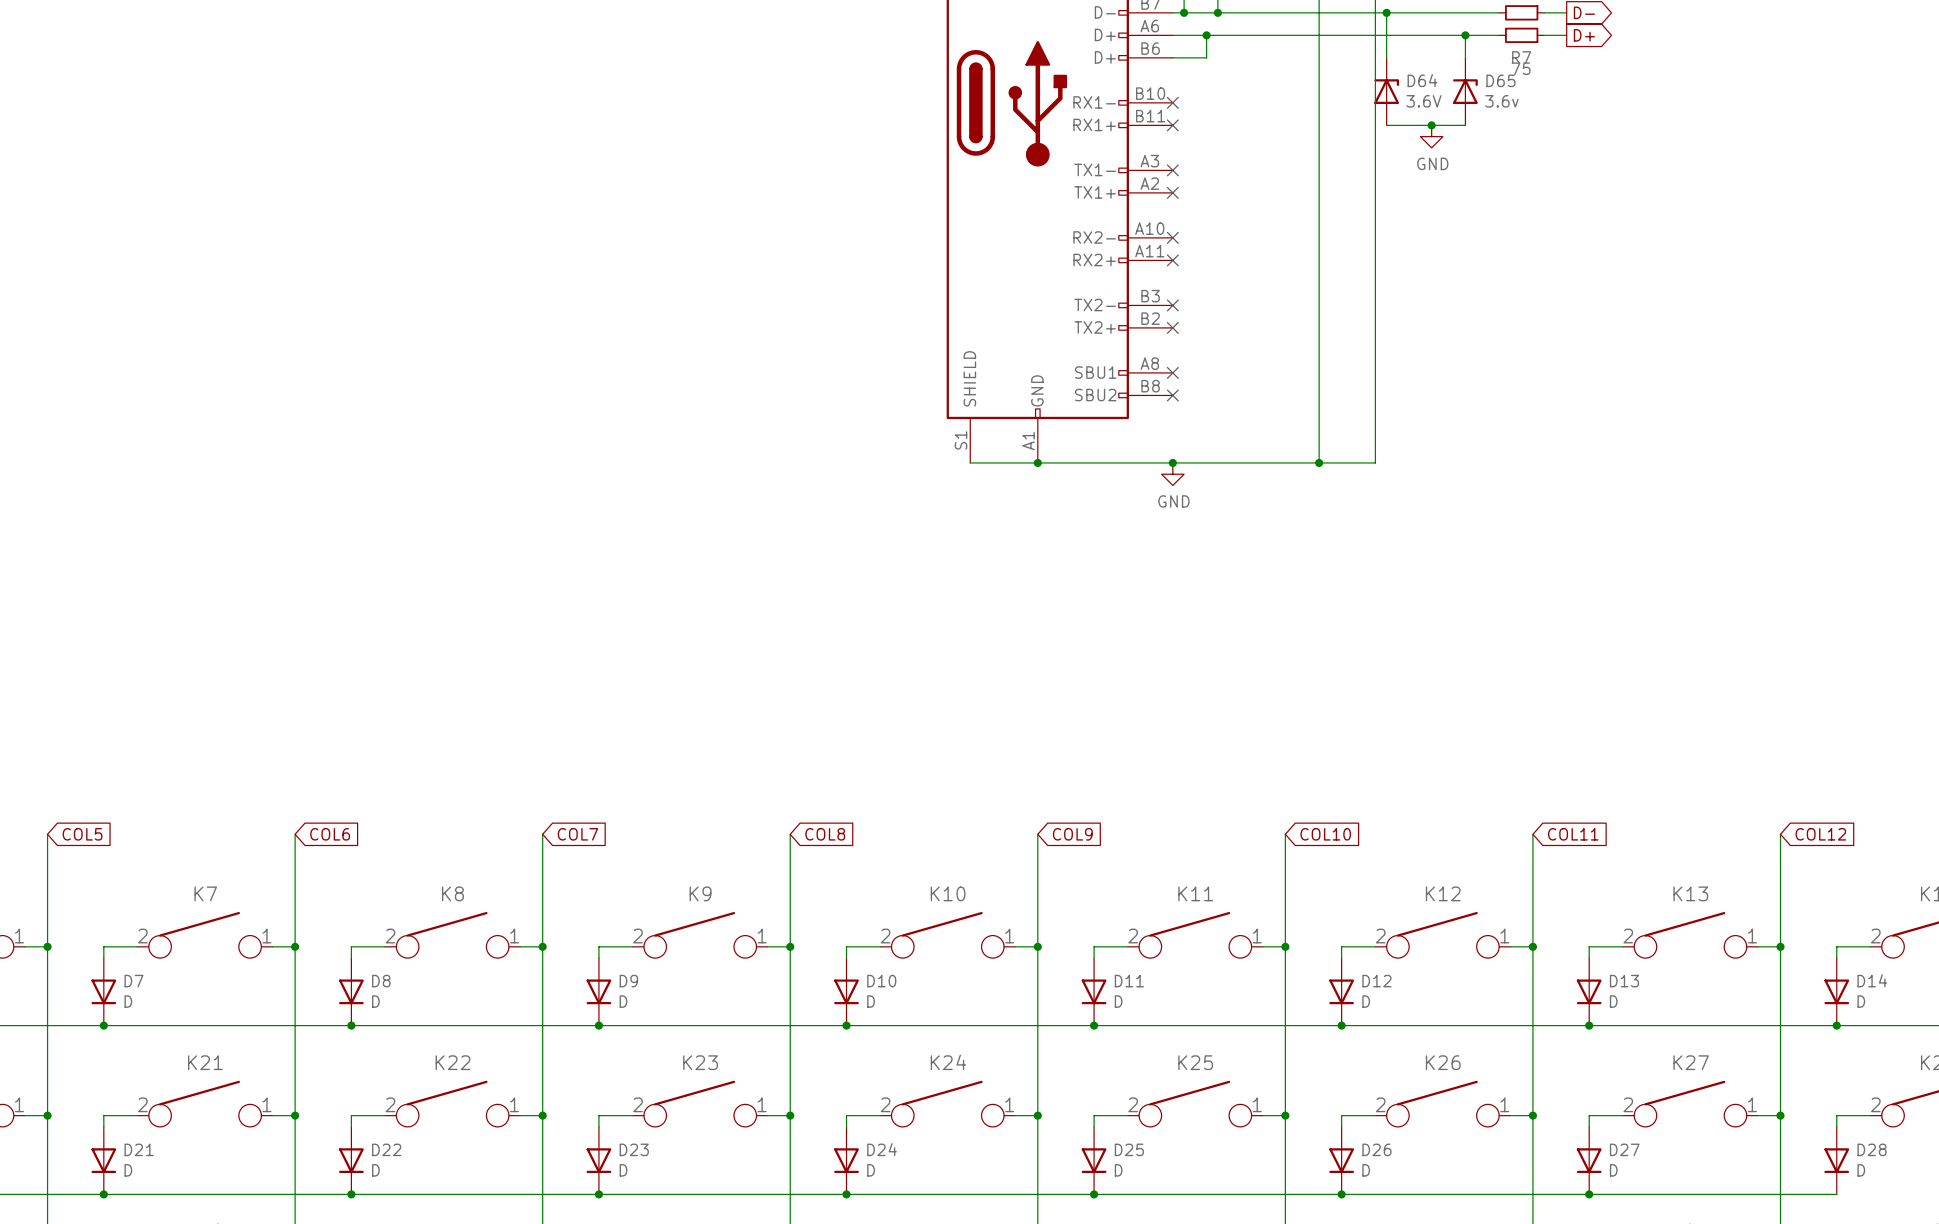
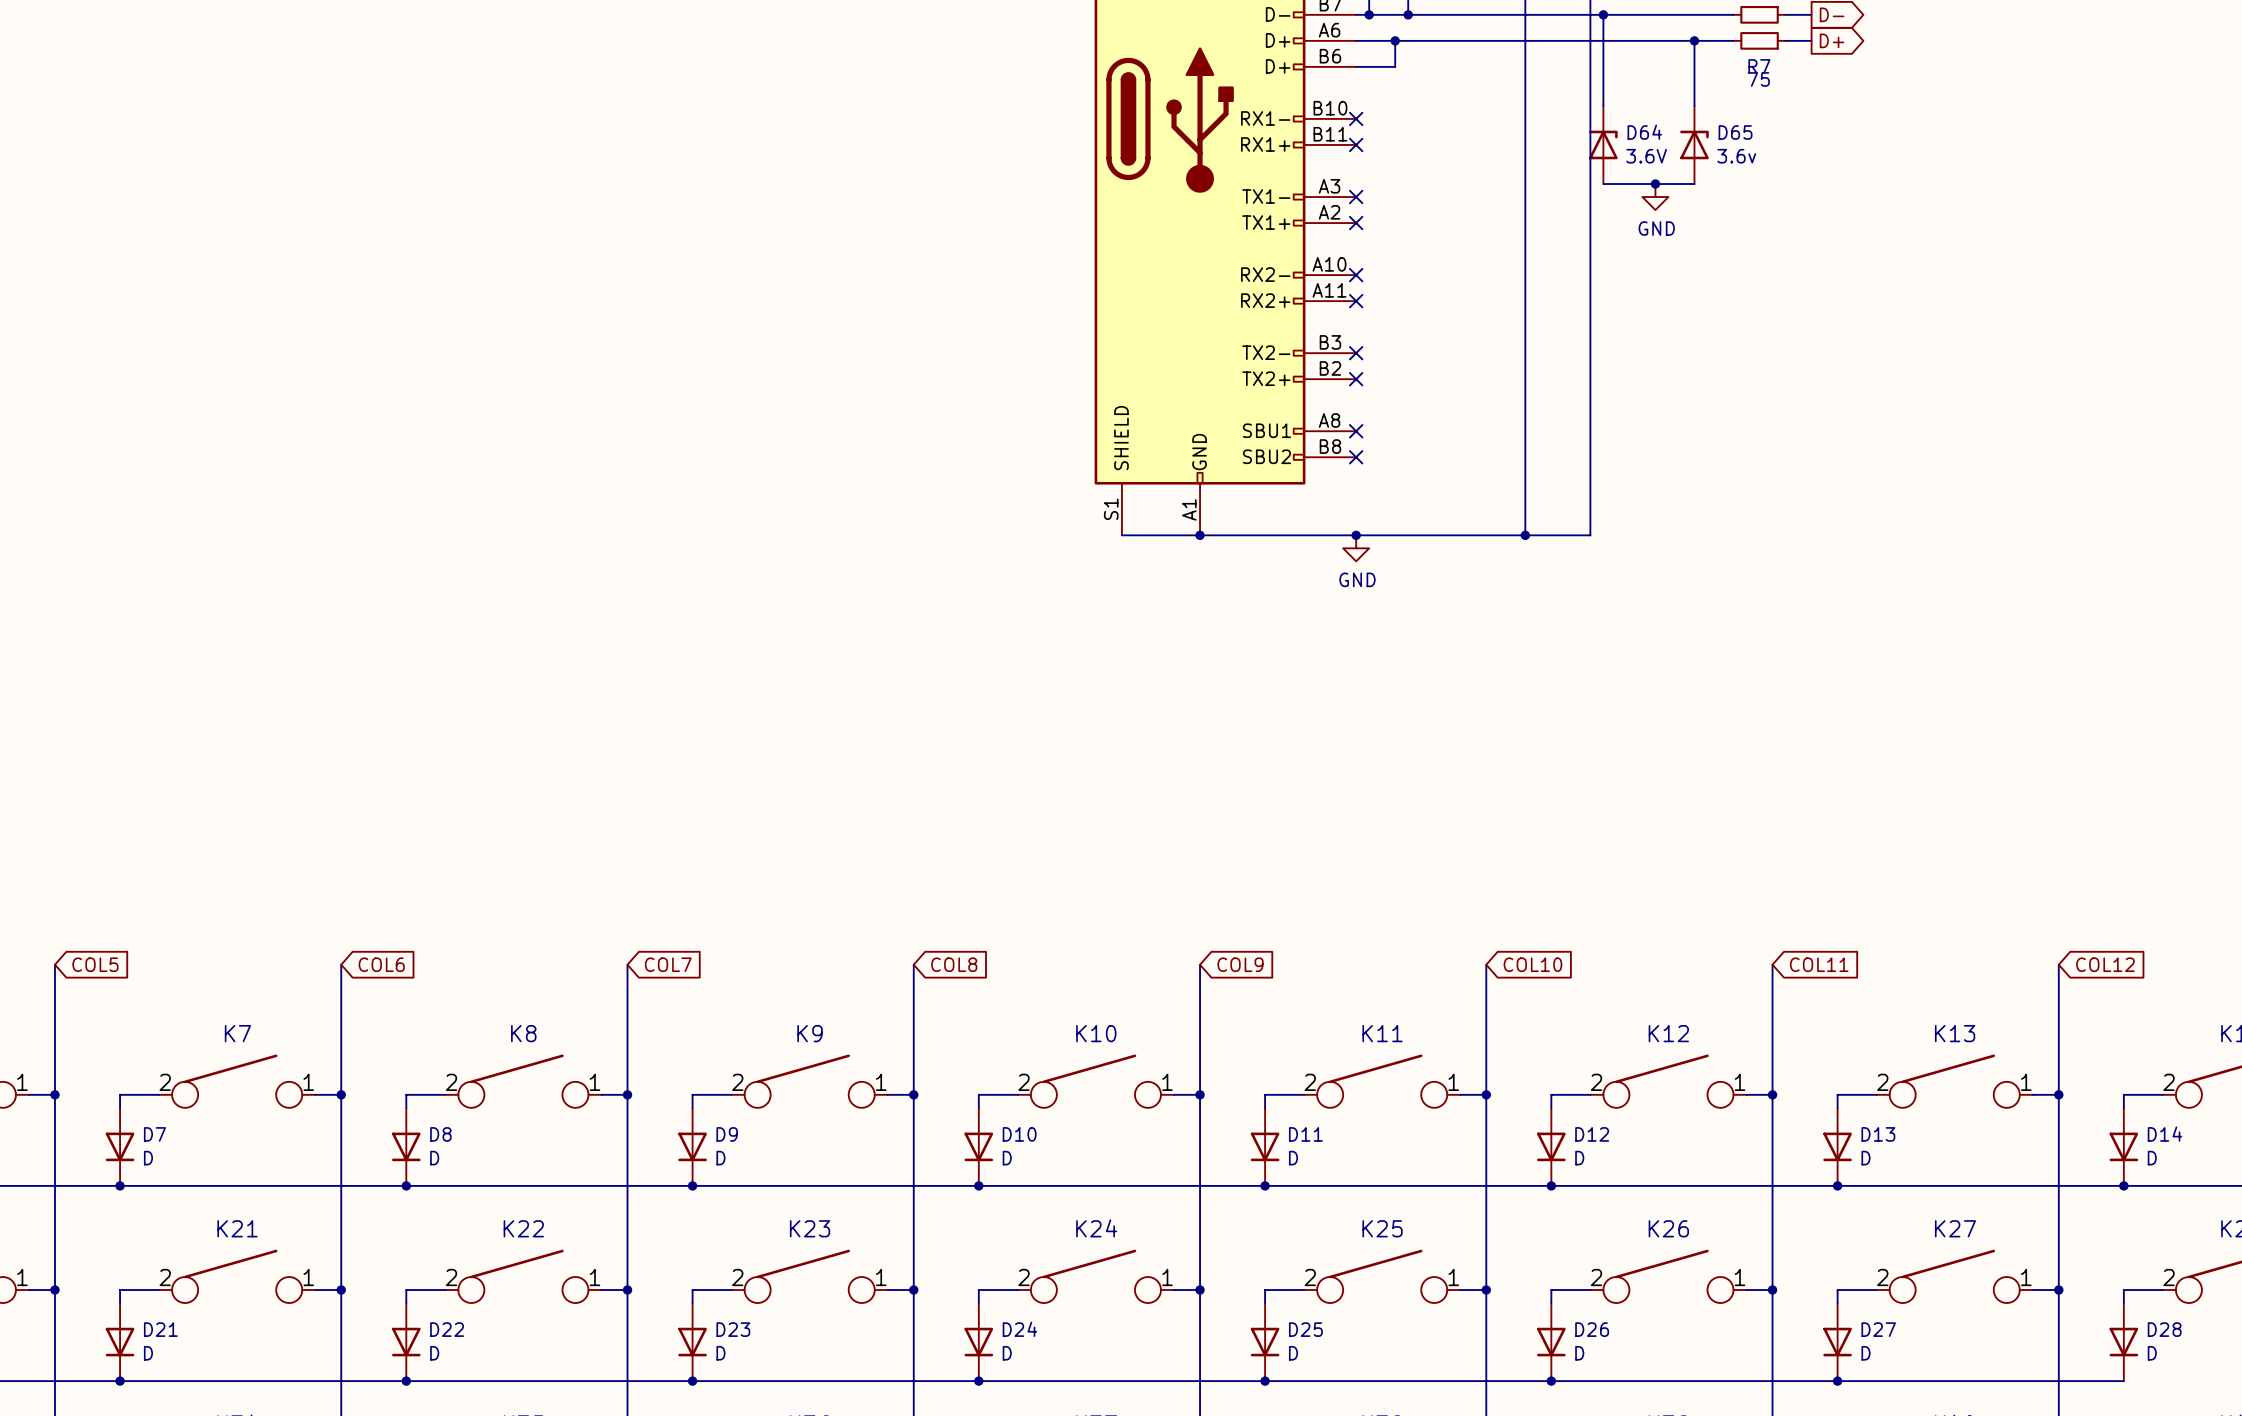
D64 position: (1386, 91) -> (1603, 144)
D65 position: (1465, 91) -> (1694, 144)
wire: (1386, 125) (1465, 125) -> (1603, 184) (1694, 184)
junction position: (1431, 125) -> (1655, 184)
power symbol position: GND (1431, 136) -> GND (1655, 197)

